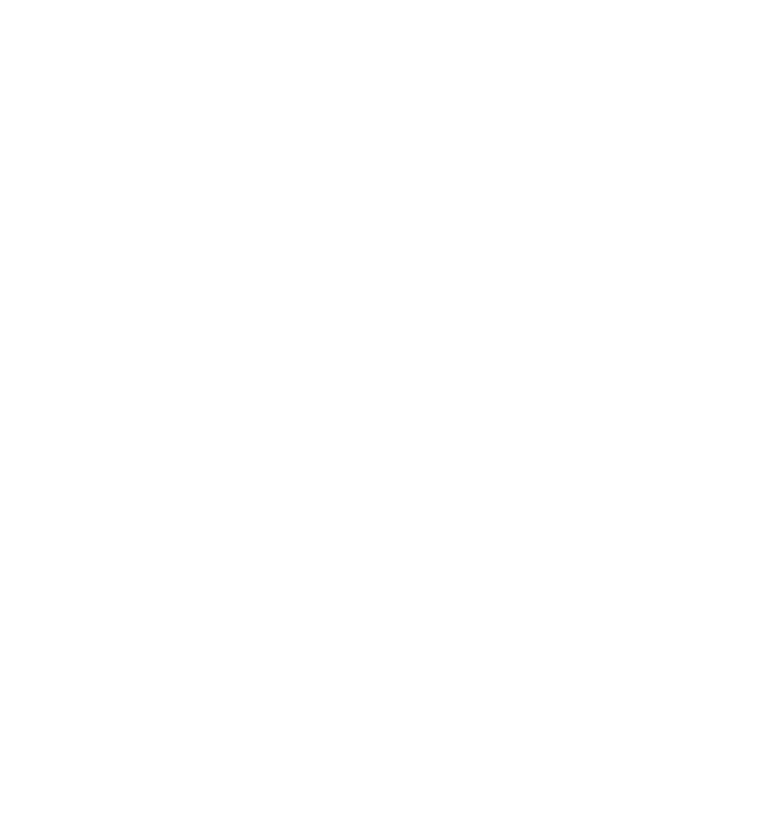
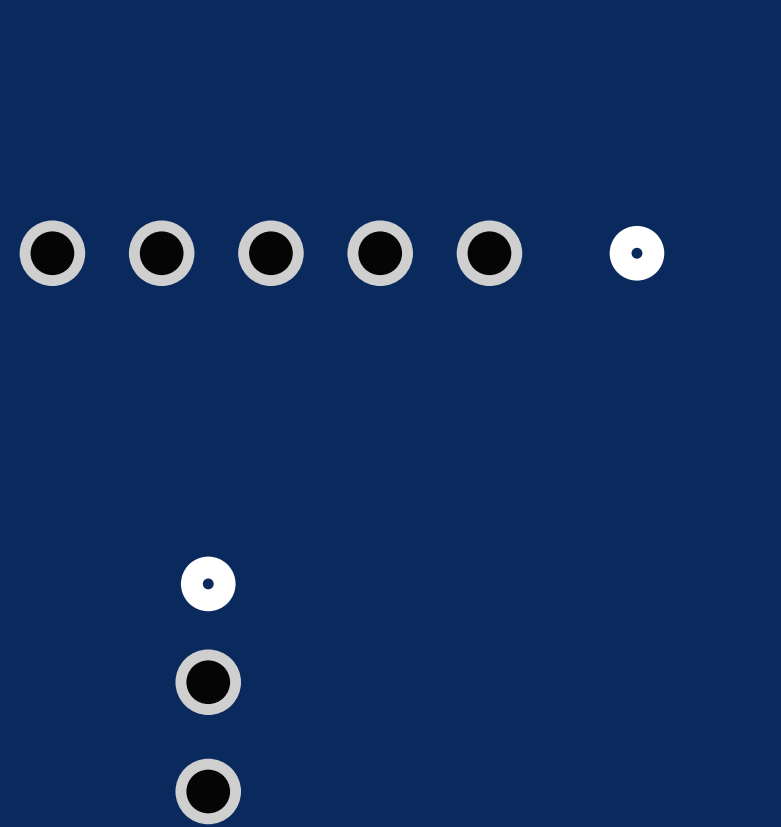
part: none -> (341, 253)
part: none -> (208, 690)

